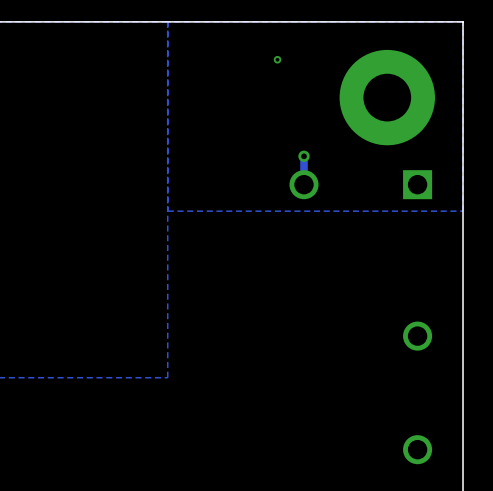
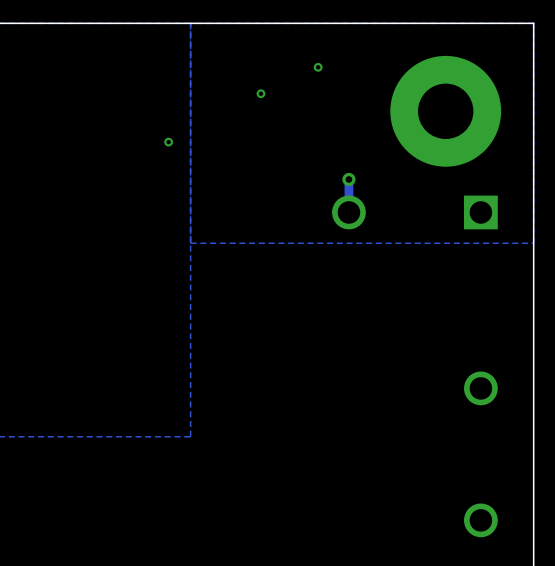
via: none -> (260, 93)
via: none -> (168, 142)

